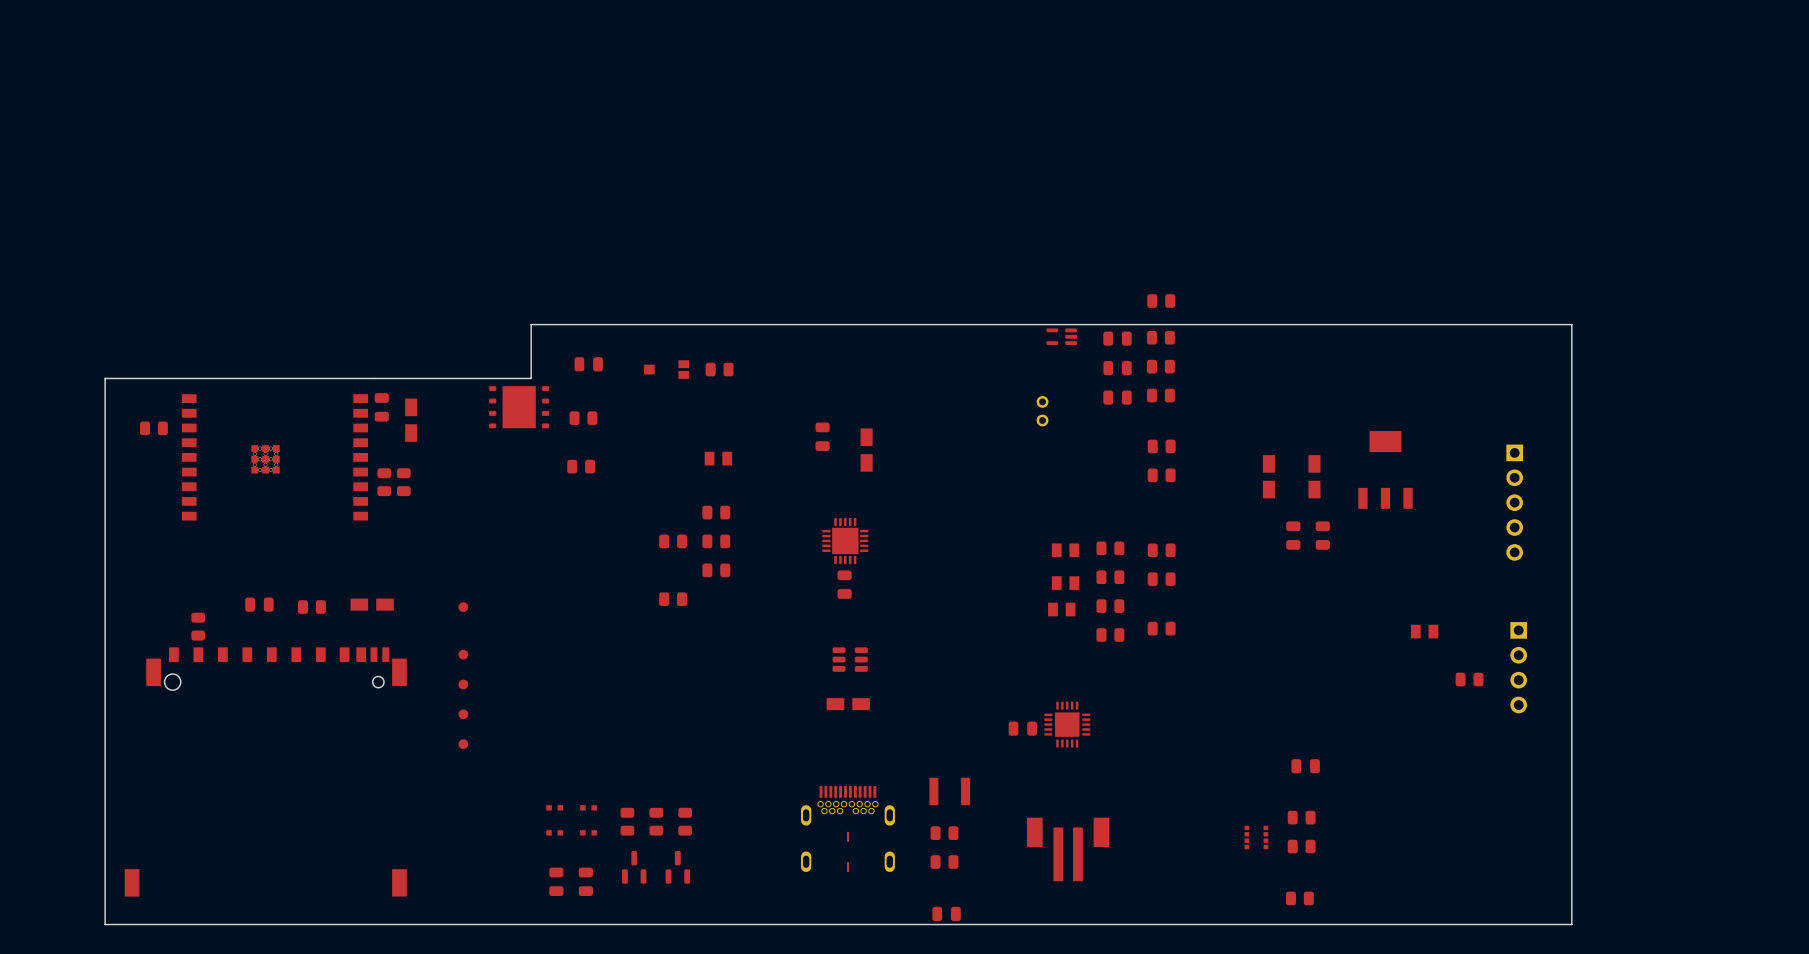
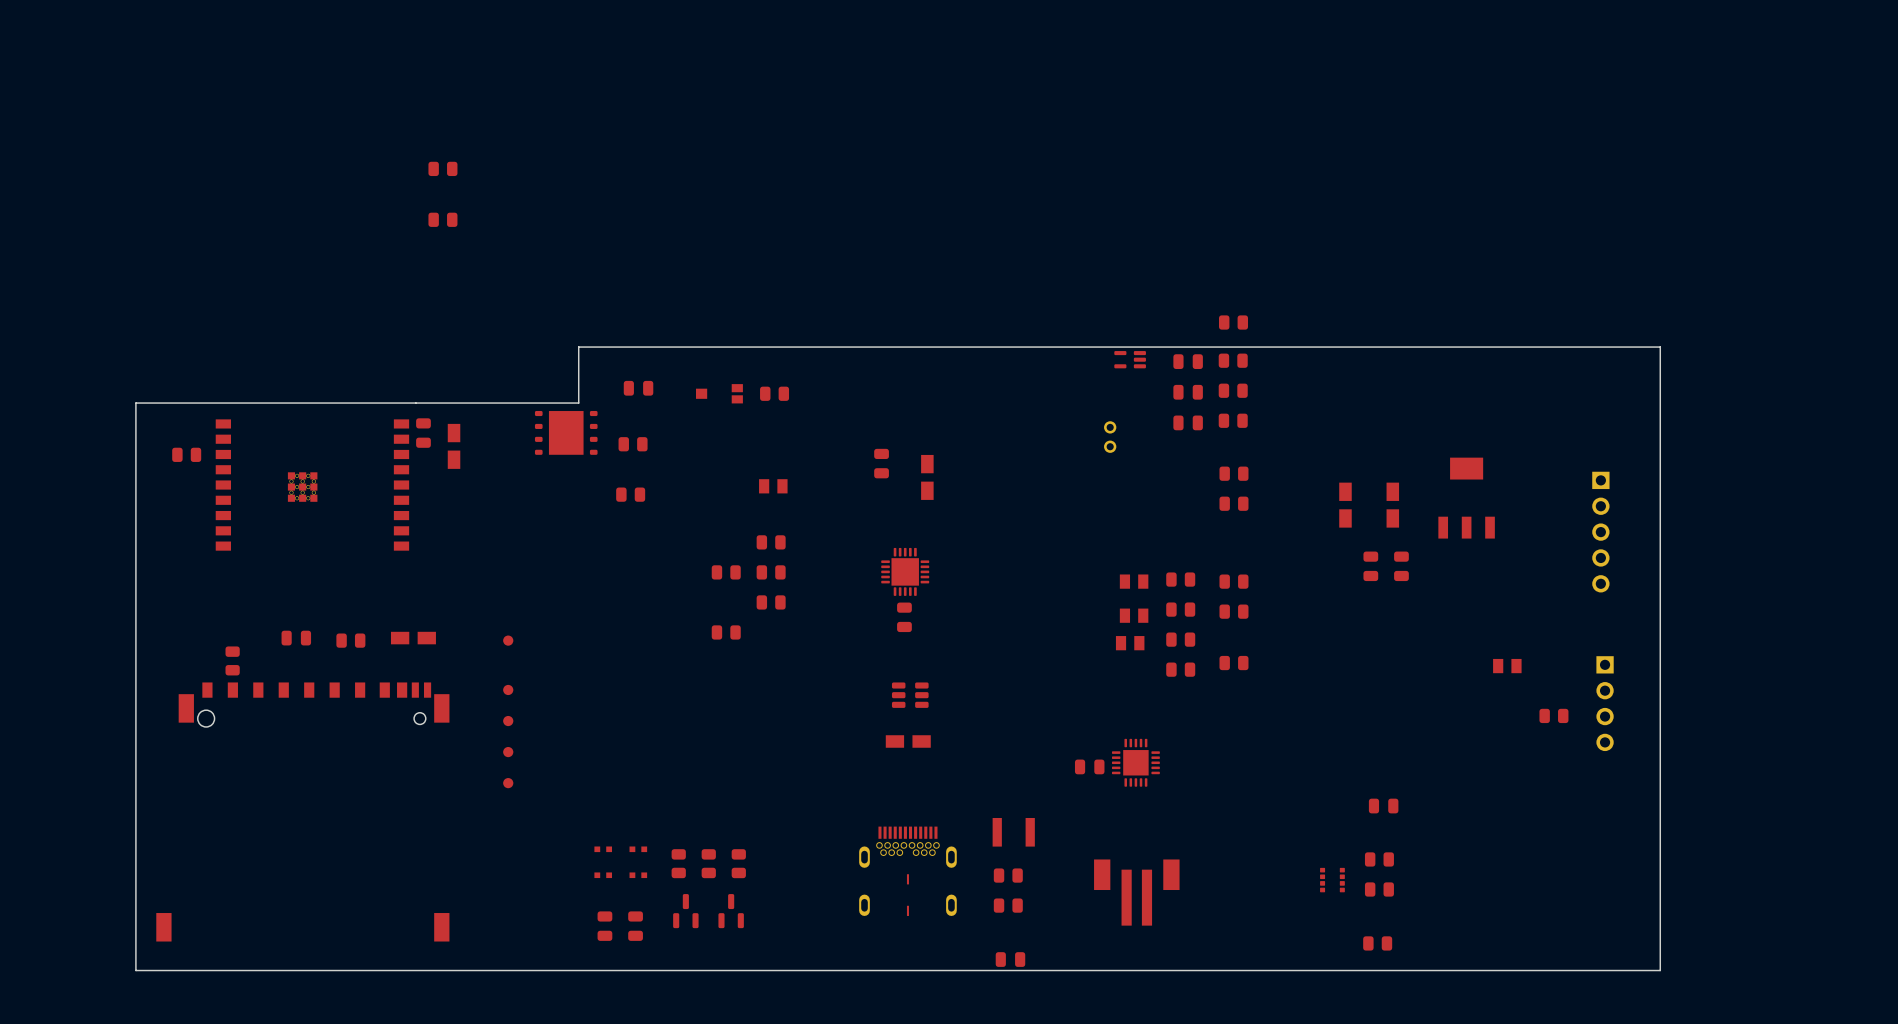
part: none -> (442, 168)
part: none -> (442, 219)
part: (384, 482) -> none
part: (403, 482) -> none

